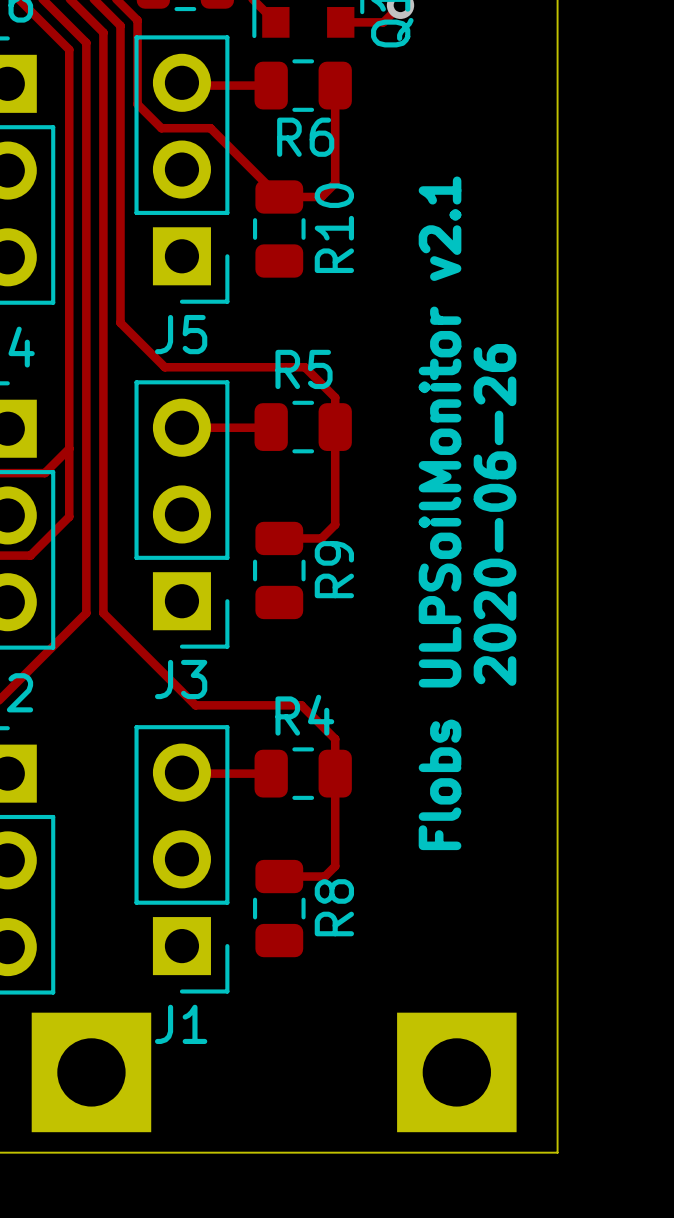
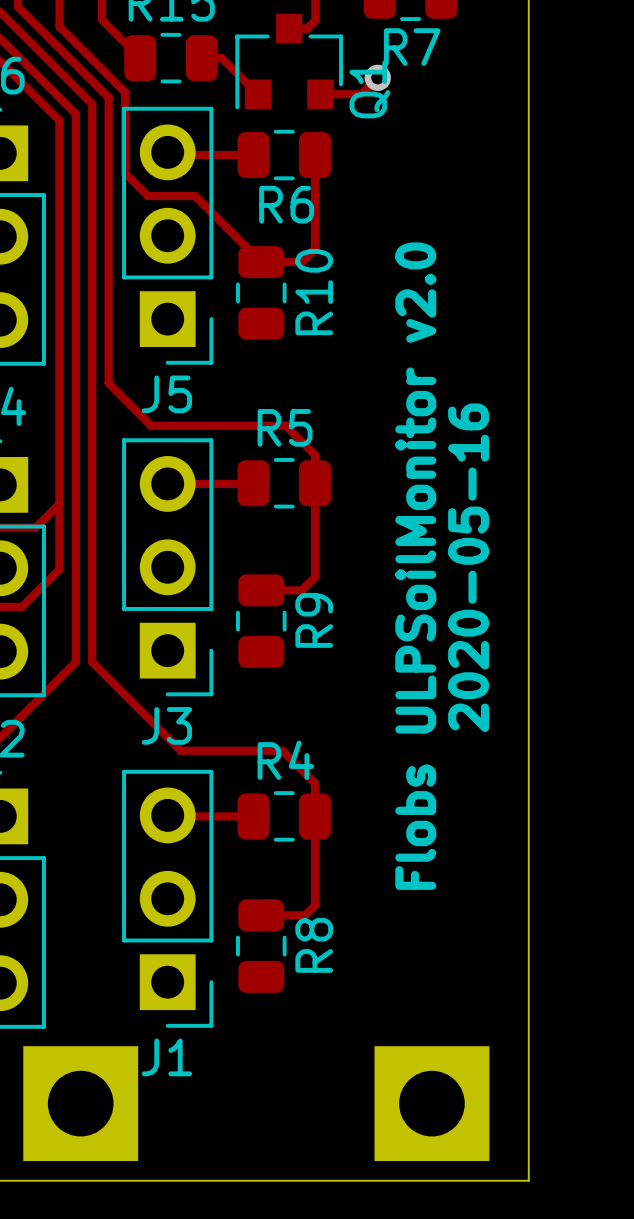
text: Flobs ULPSoilMonitor v2.1 (440, 513) -> Flobs ULPSoilMonitor v2.0 (415, 566)
text: 2020-06-26 (495, 514) -> 2020-05-16 (468, 567)

